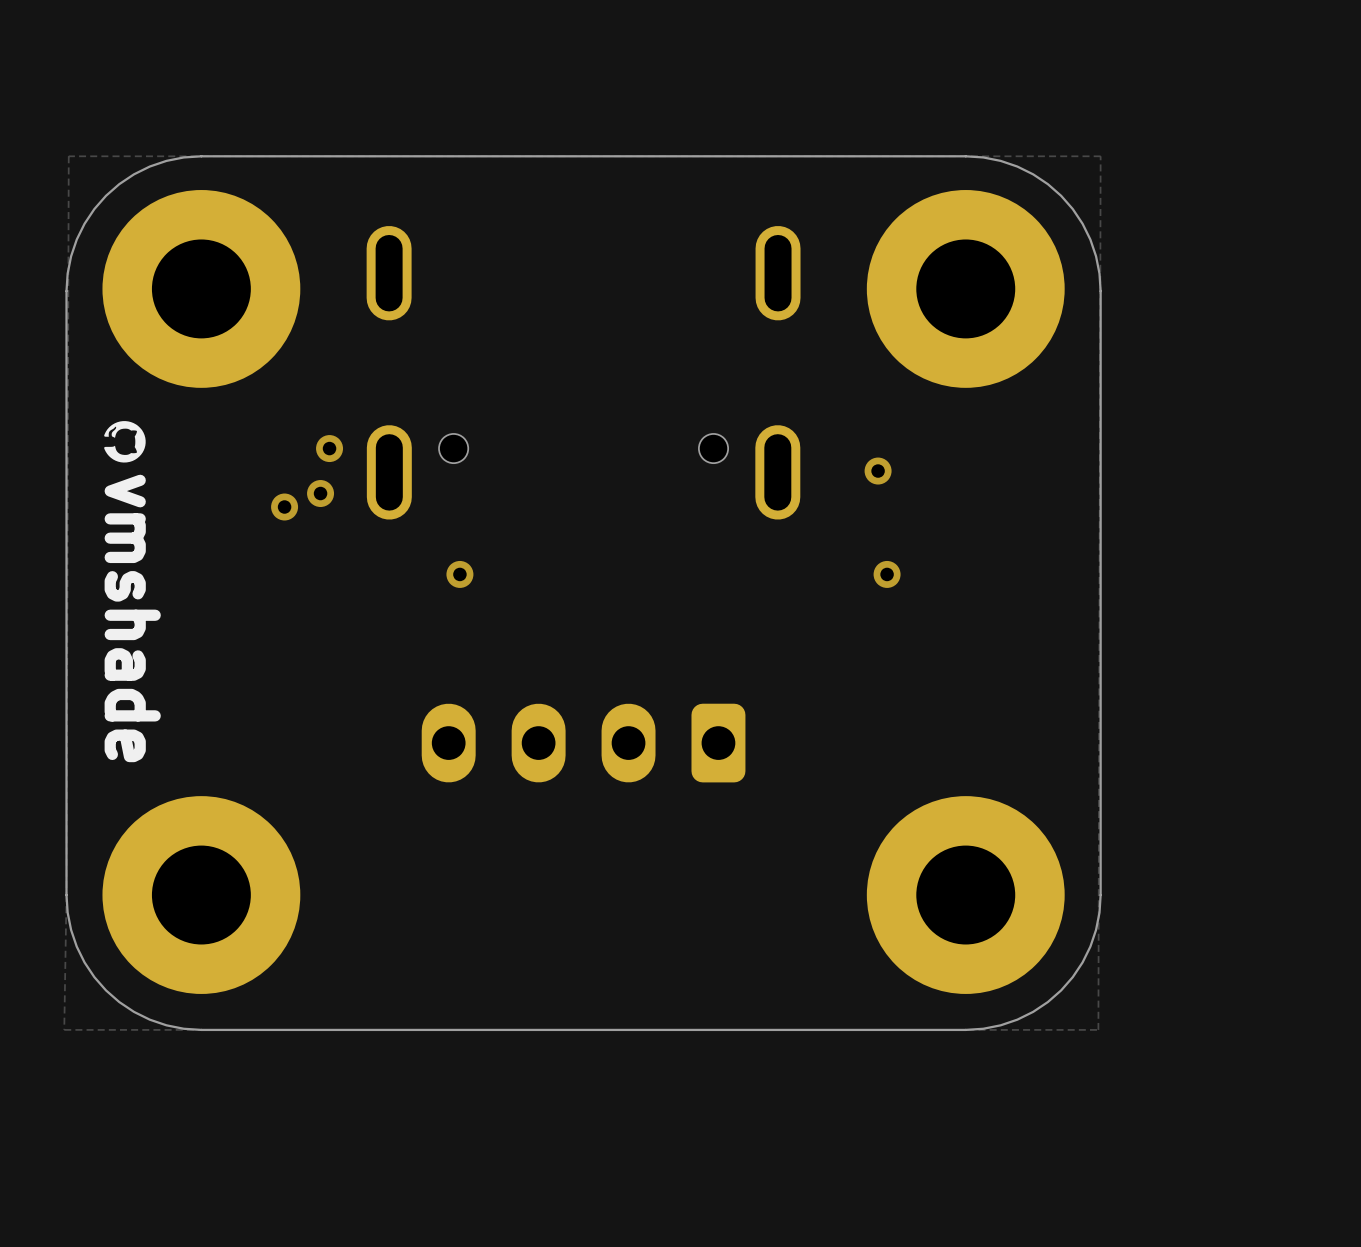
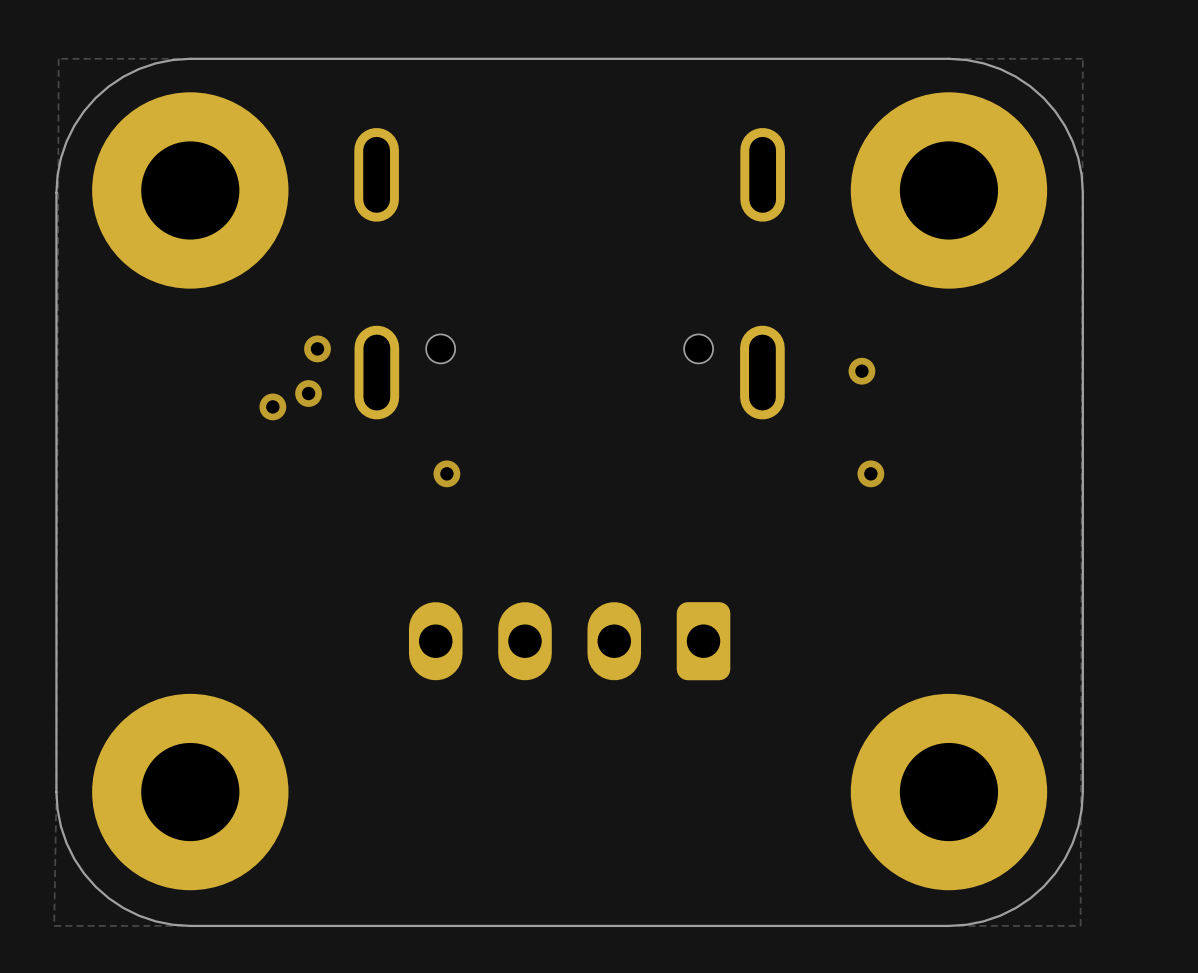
drawing: [104, 421, 146, 463] -> none
text: vmshade (132, 618) -> none

